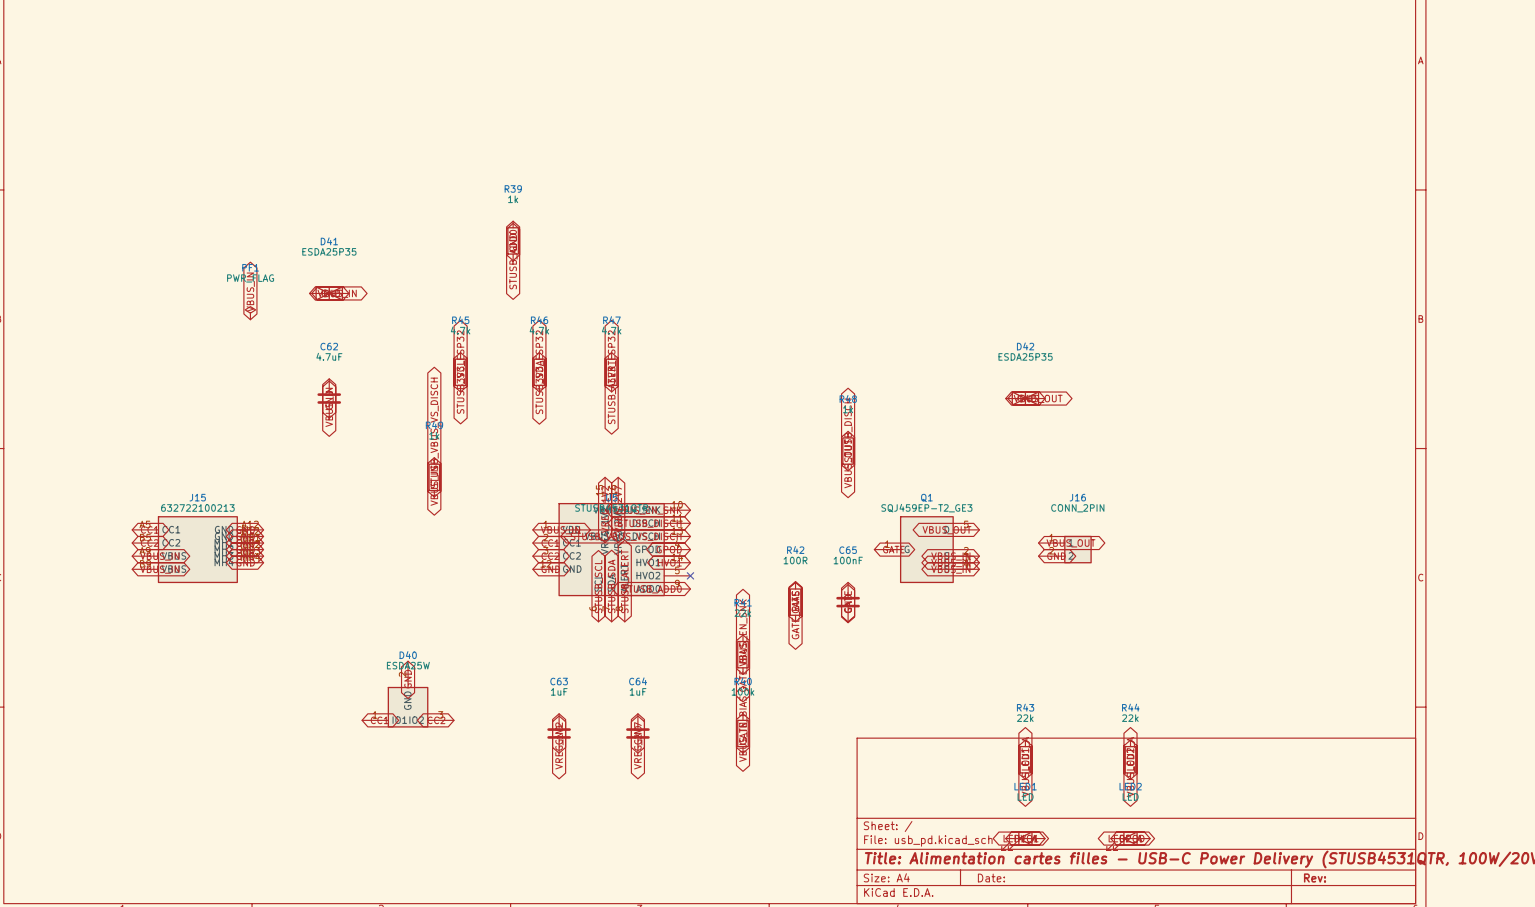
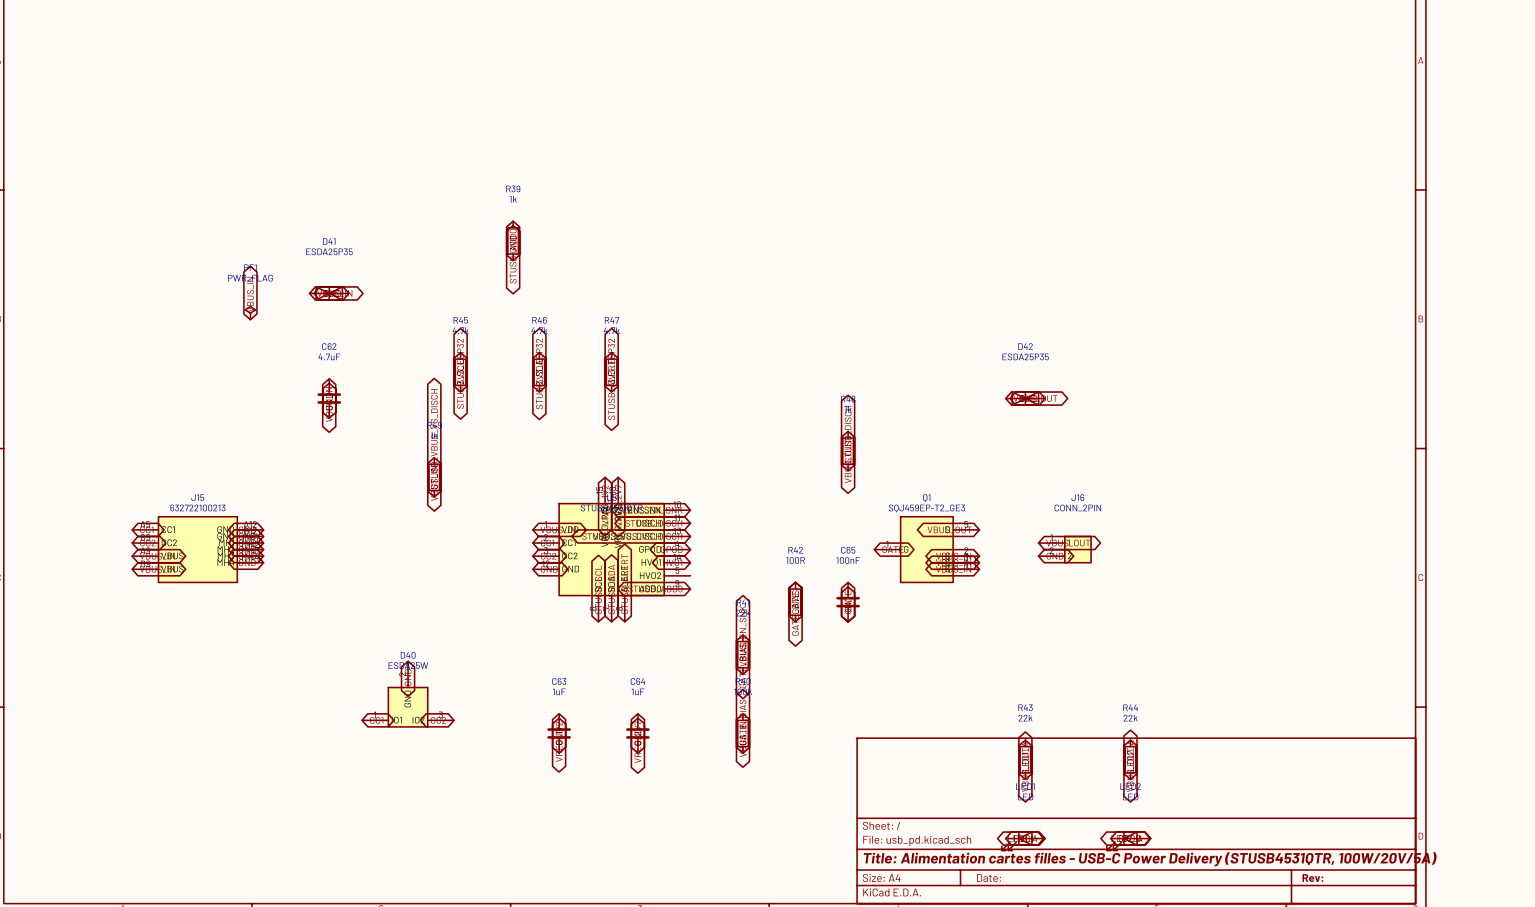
no-connect mark: (690, 575) -> none

